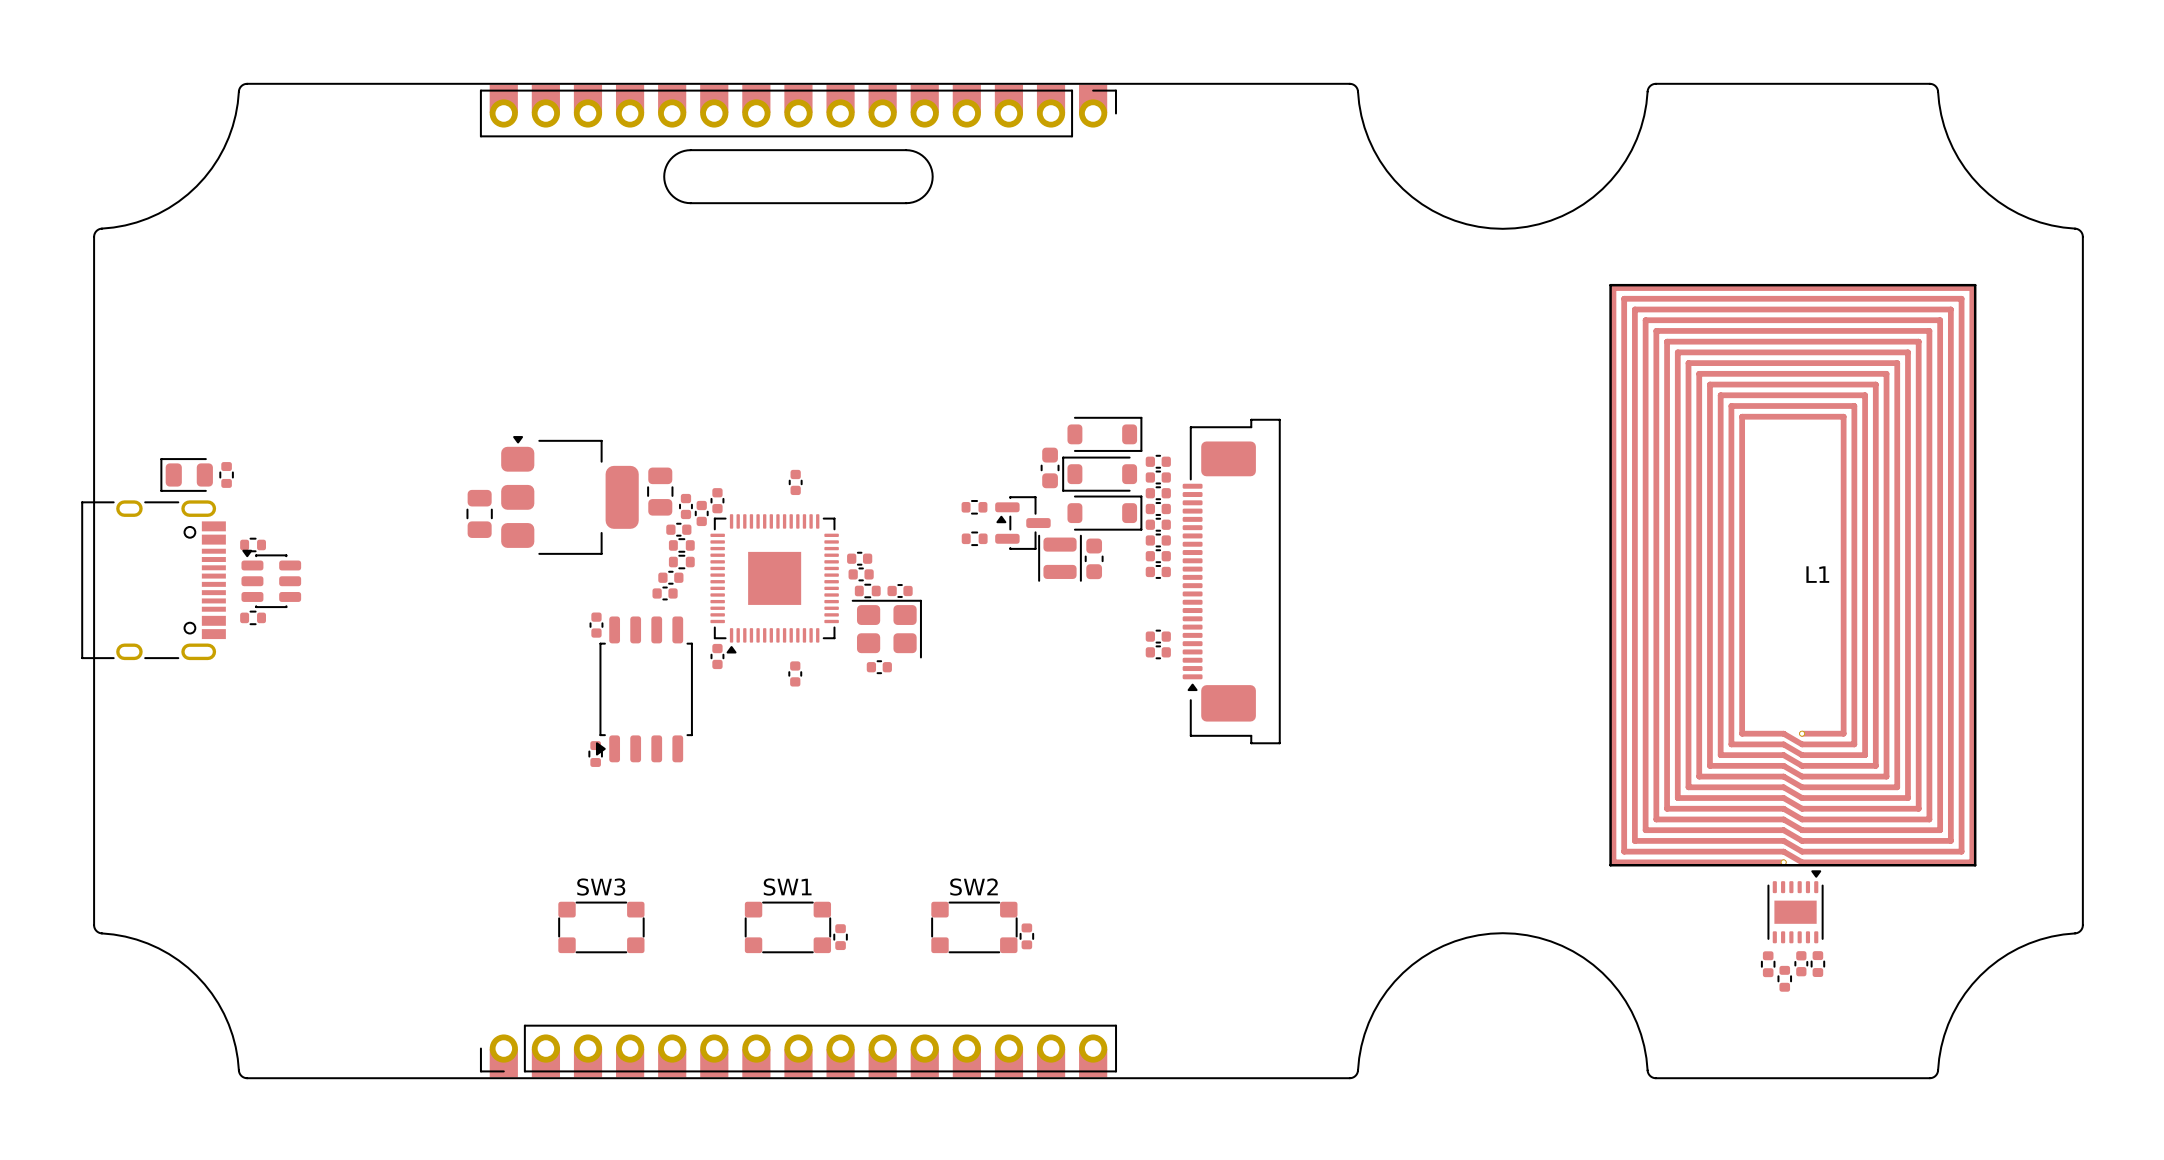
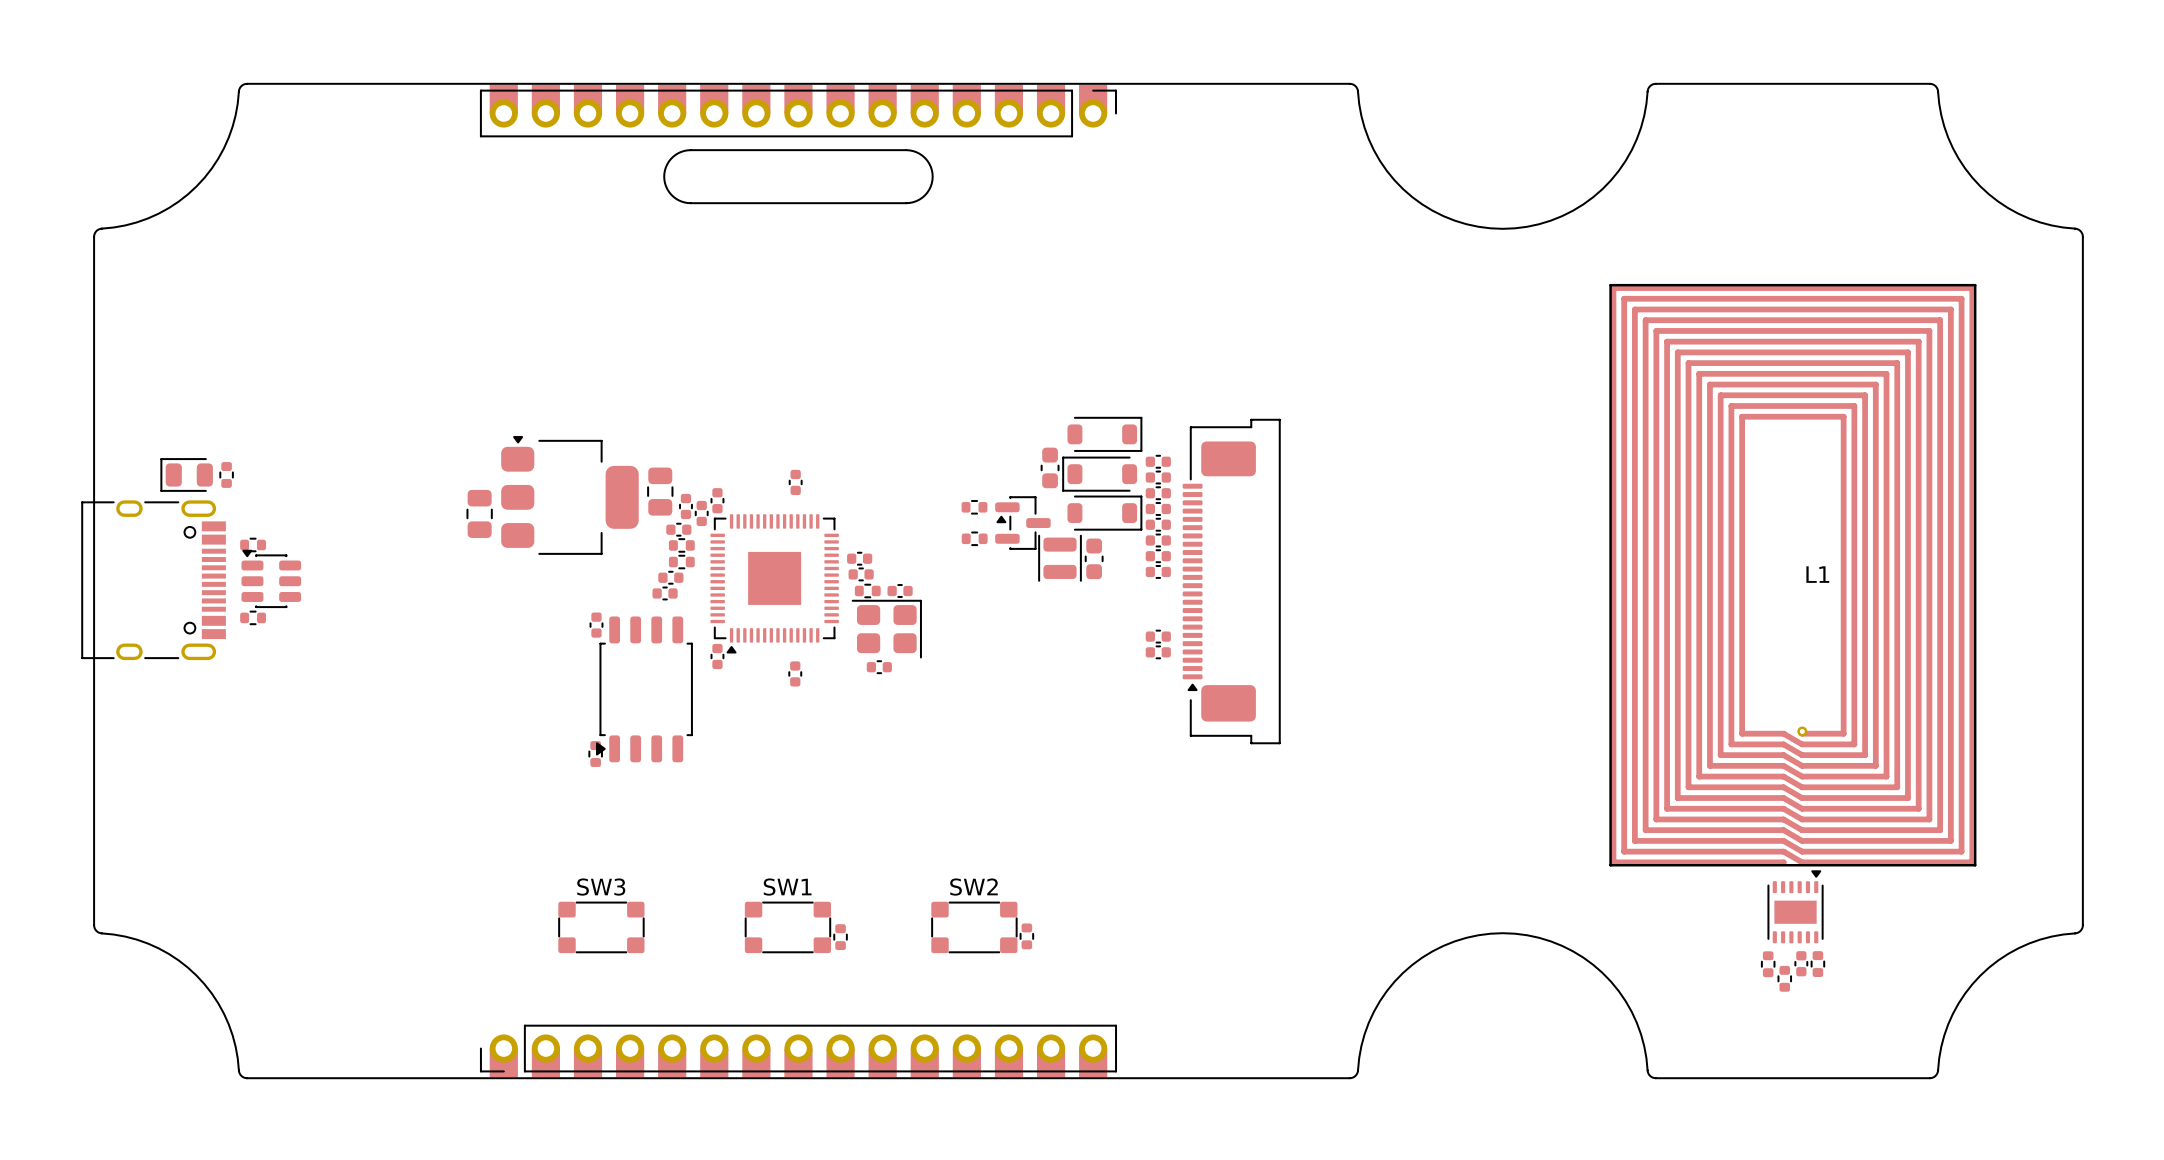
L1 footprint: [1609, 283, 1977, 867] -> [1609, 283, 1977, 867]

